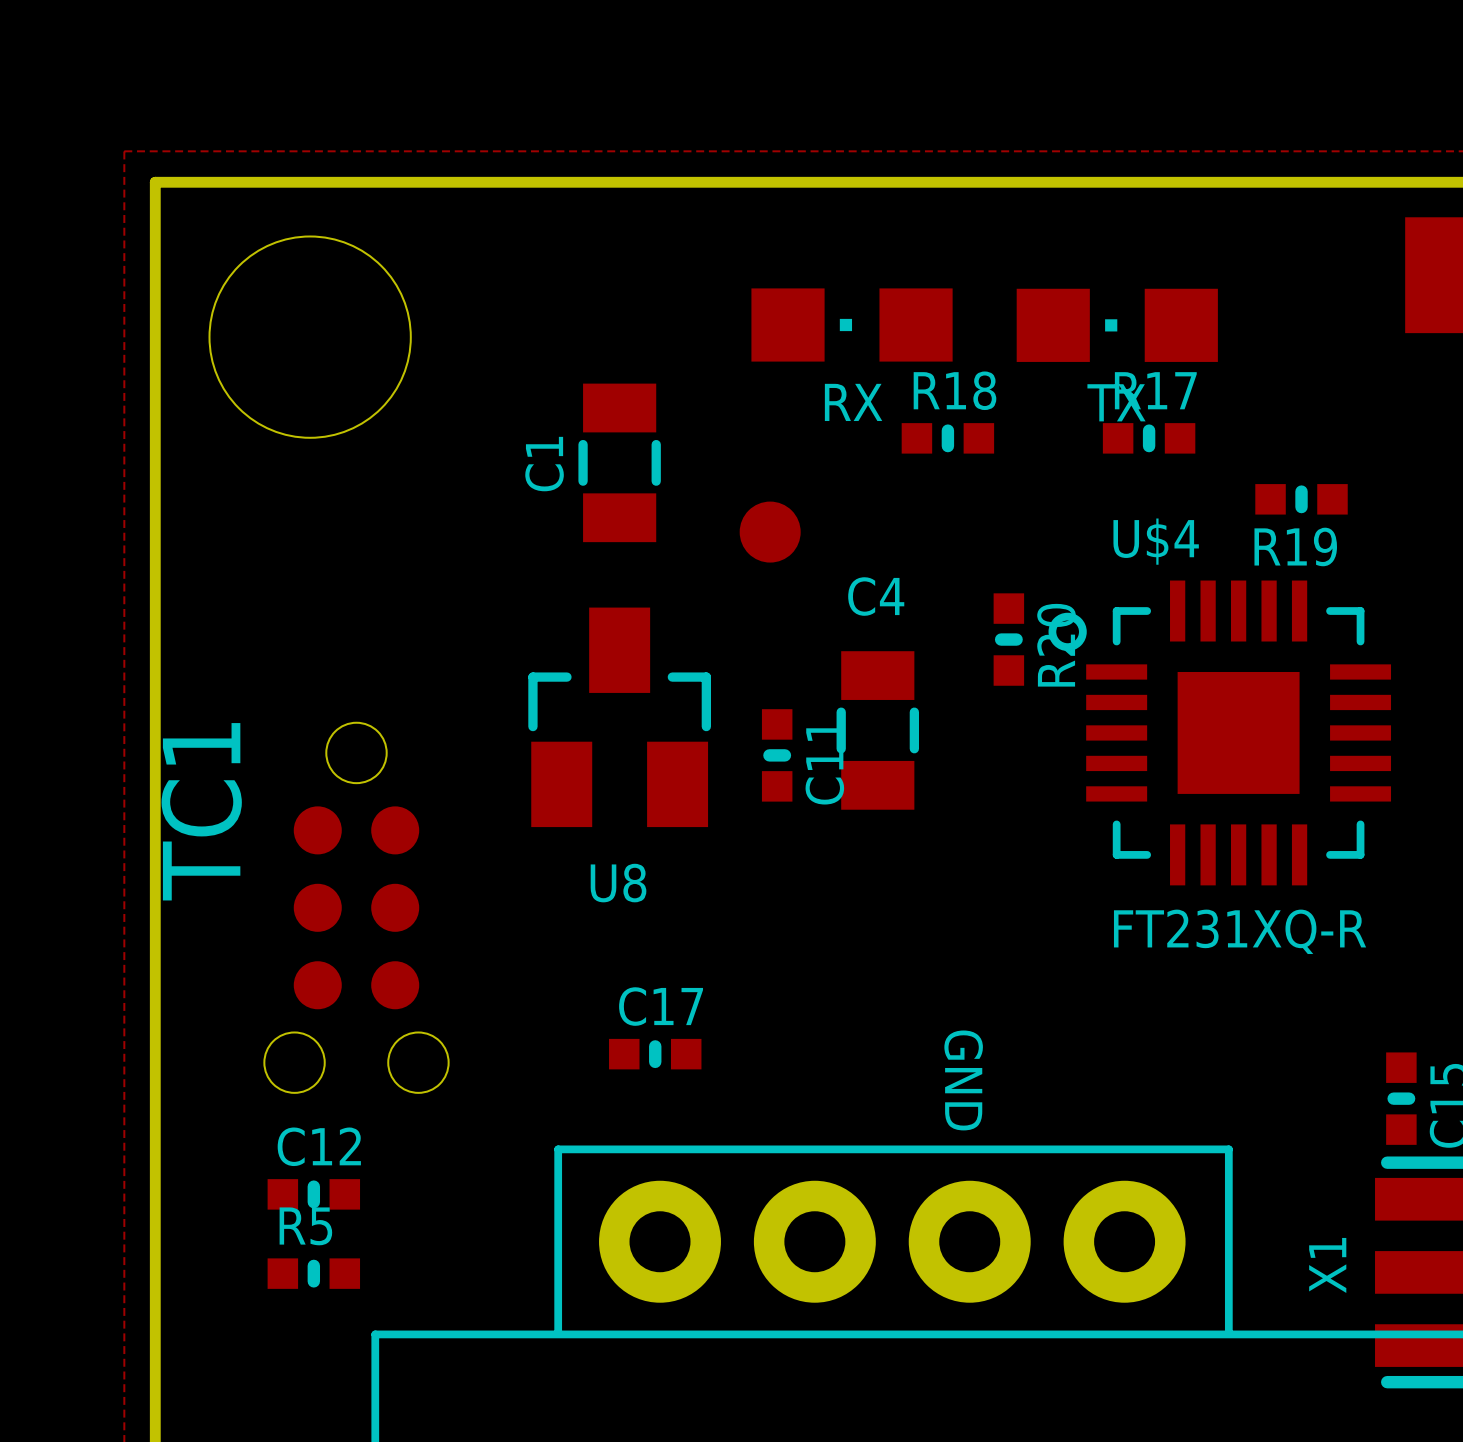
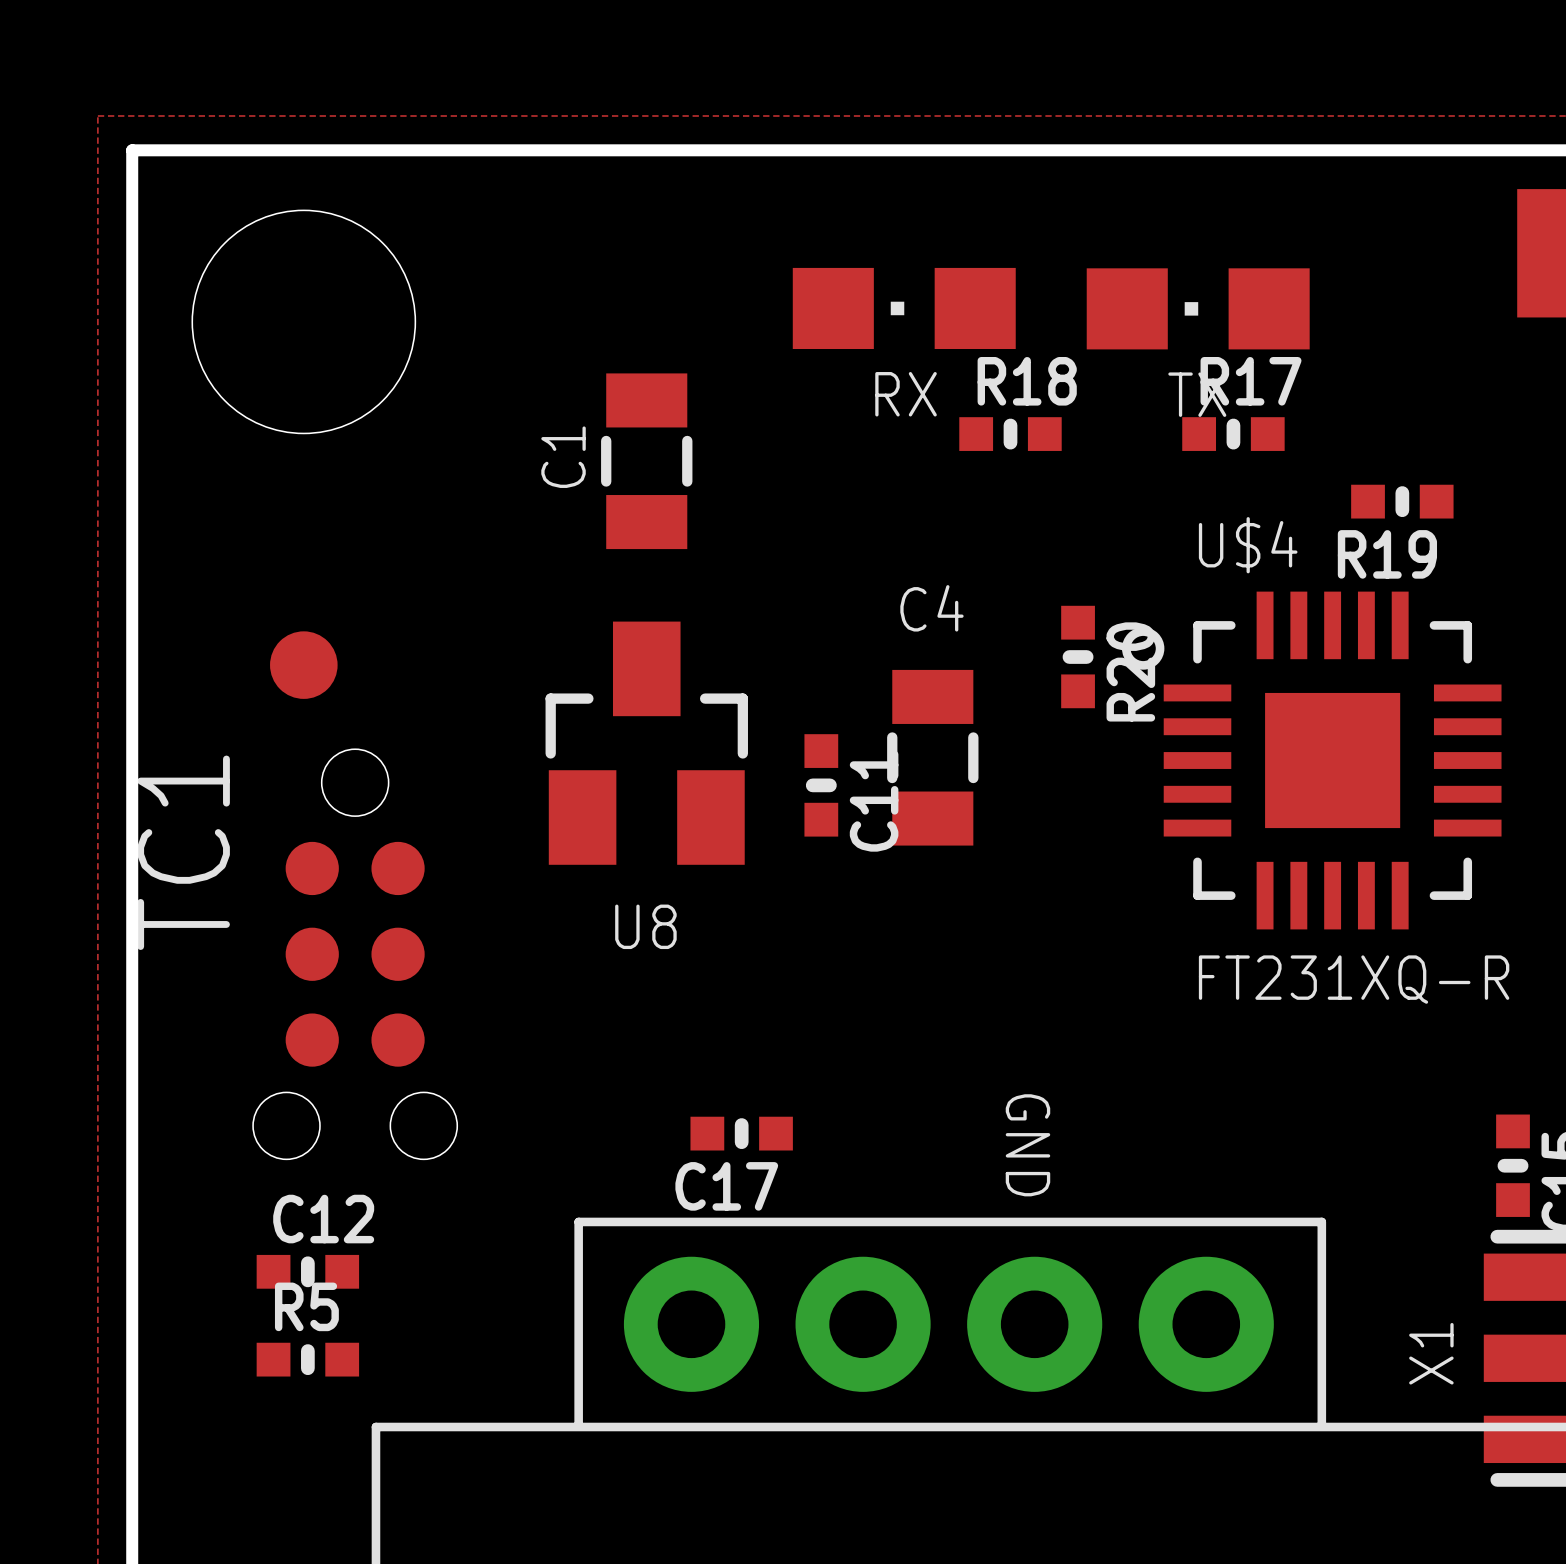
part position: (770, 532) -> (303, 665)
C17 name position: C17 (661, 1006) -> C17 (726, 1186)
C17 position: (655, 1054) -> (741, 1133)

